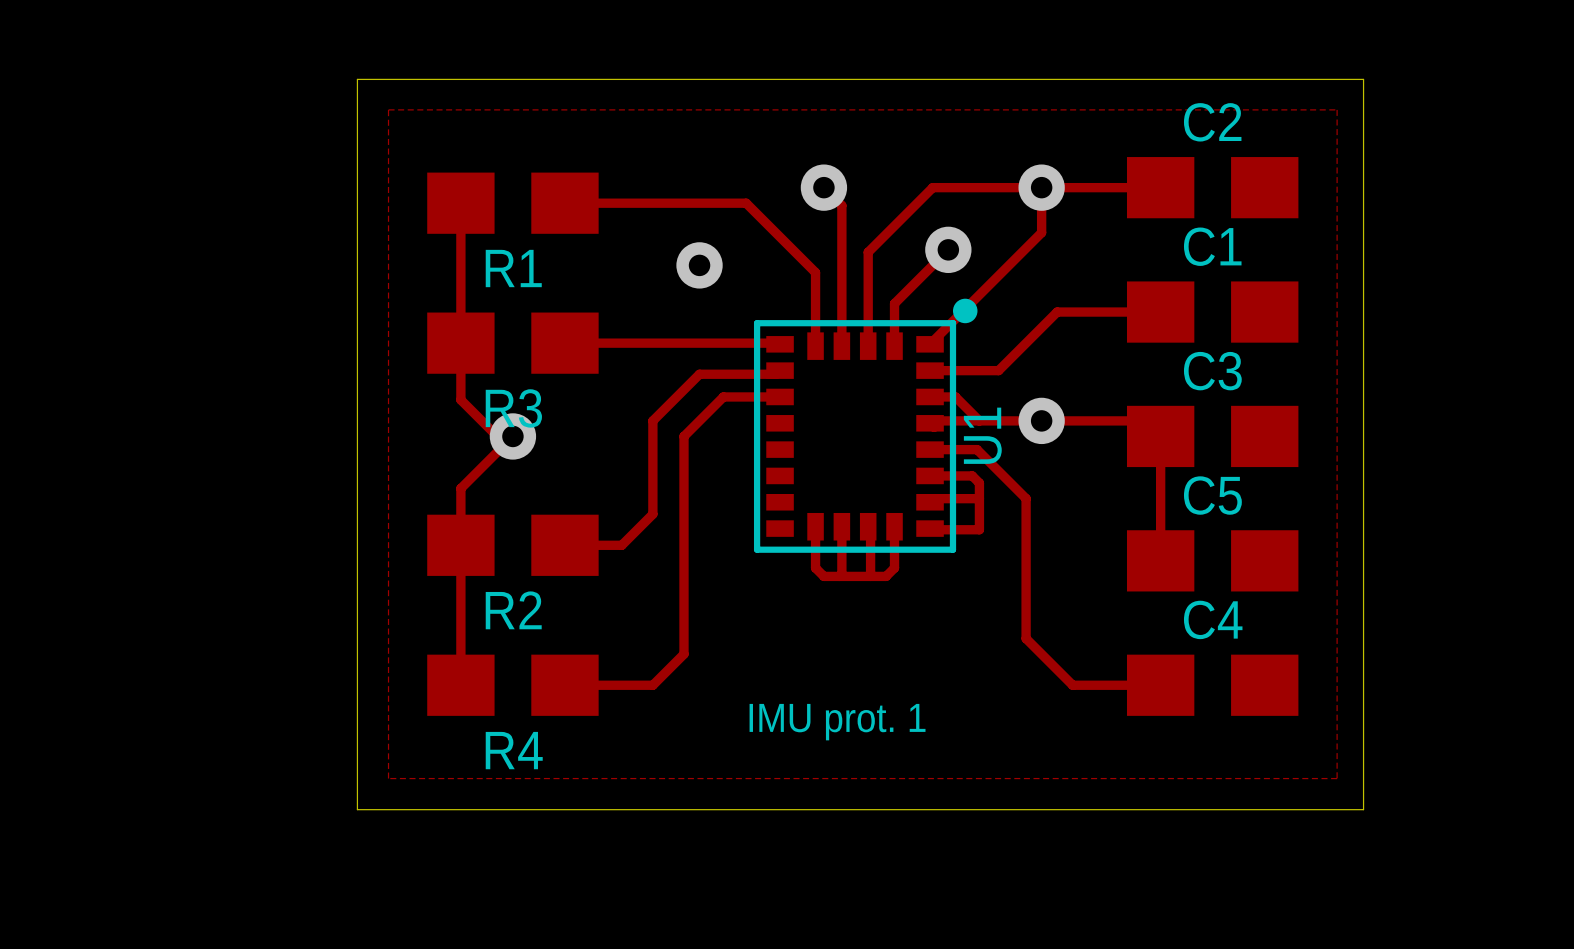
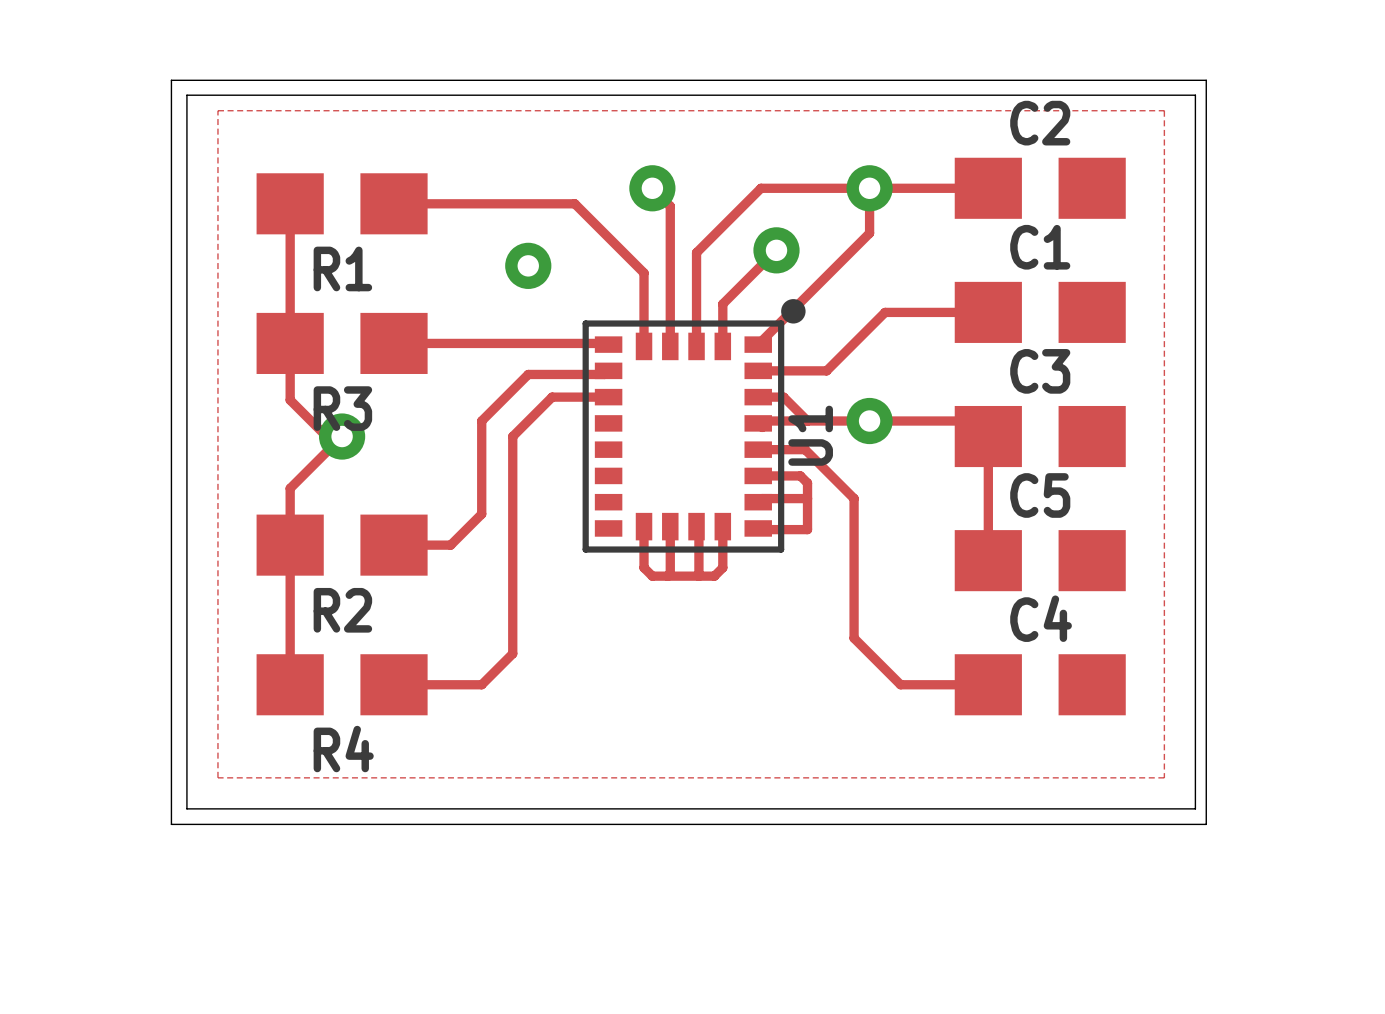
board edge: (357, 79) (357, 94) -> (186, 80) (171, 80) (171, 824) (1206, 824) (1206, 80) (1190, 80)
board edge: (1363, 79) (1363, 809) -> (186, 95) (1195, 95) (1195, 808) (1190, 808)
text: IMU prot. 1 (837, 722) -> none

